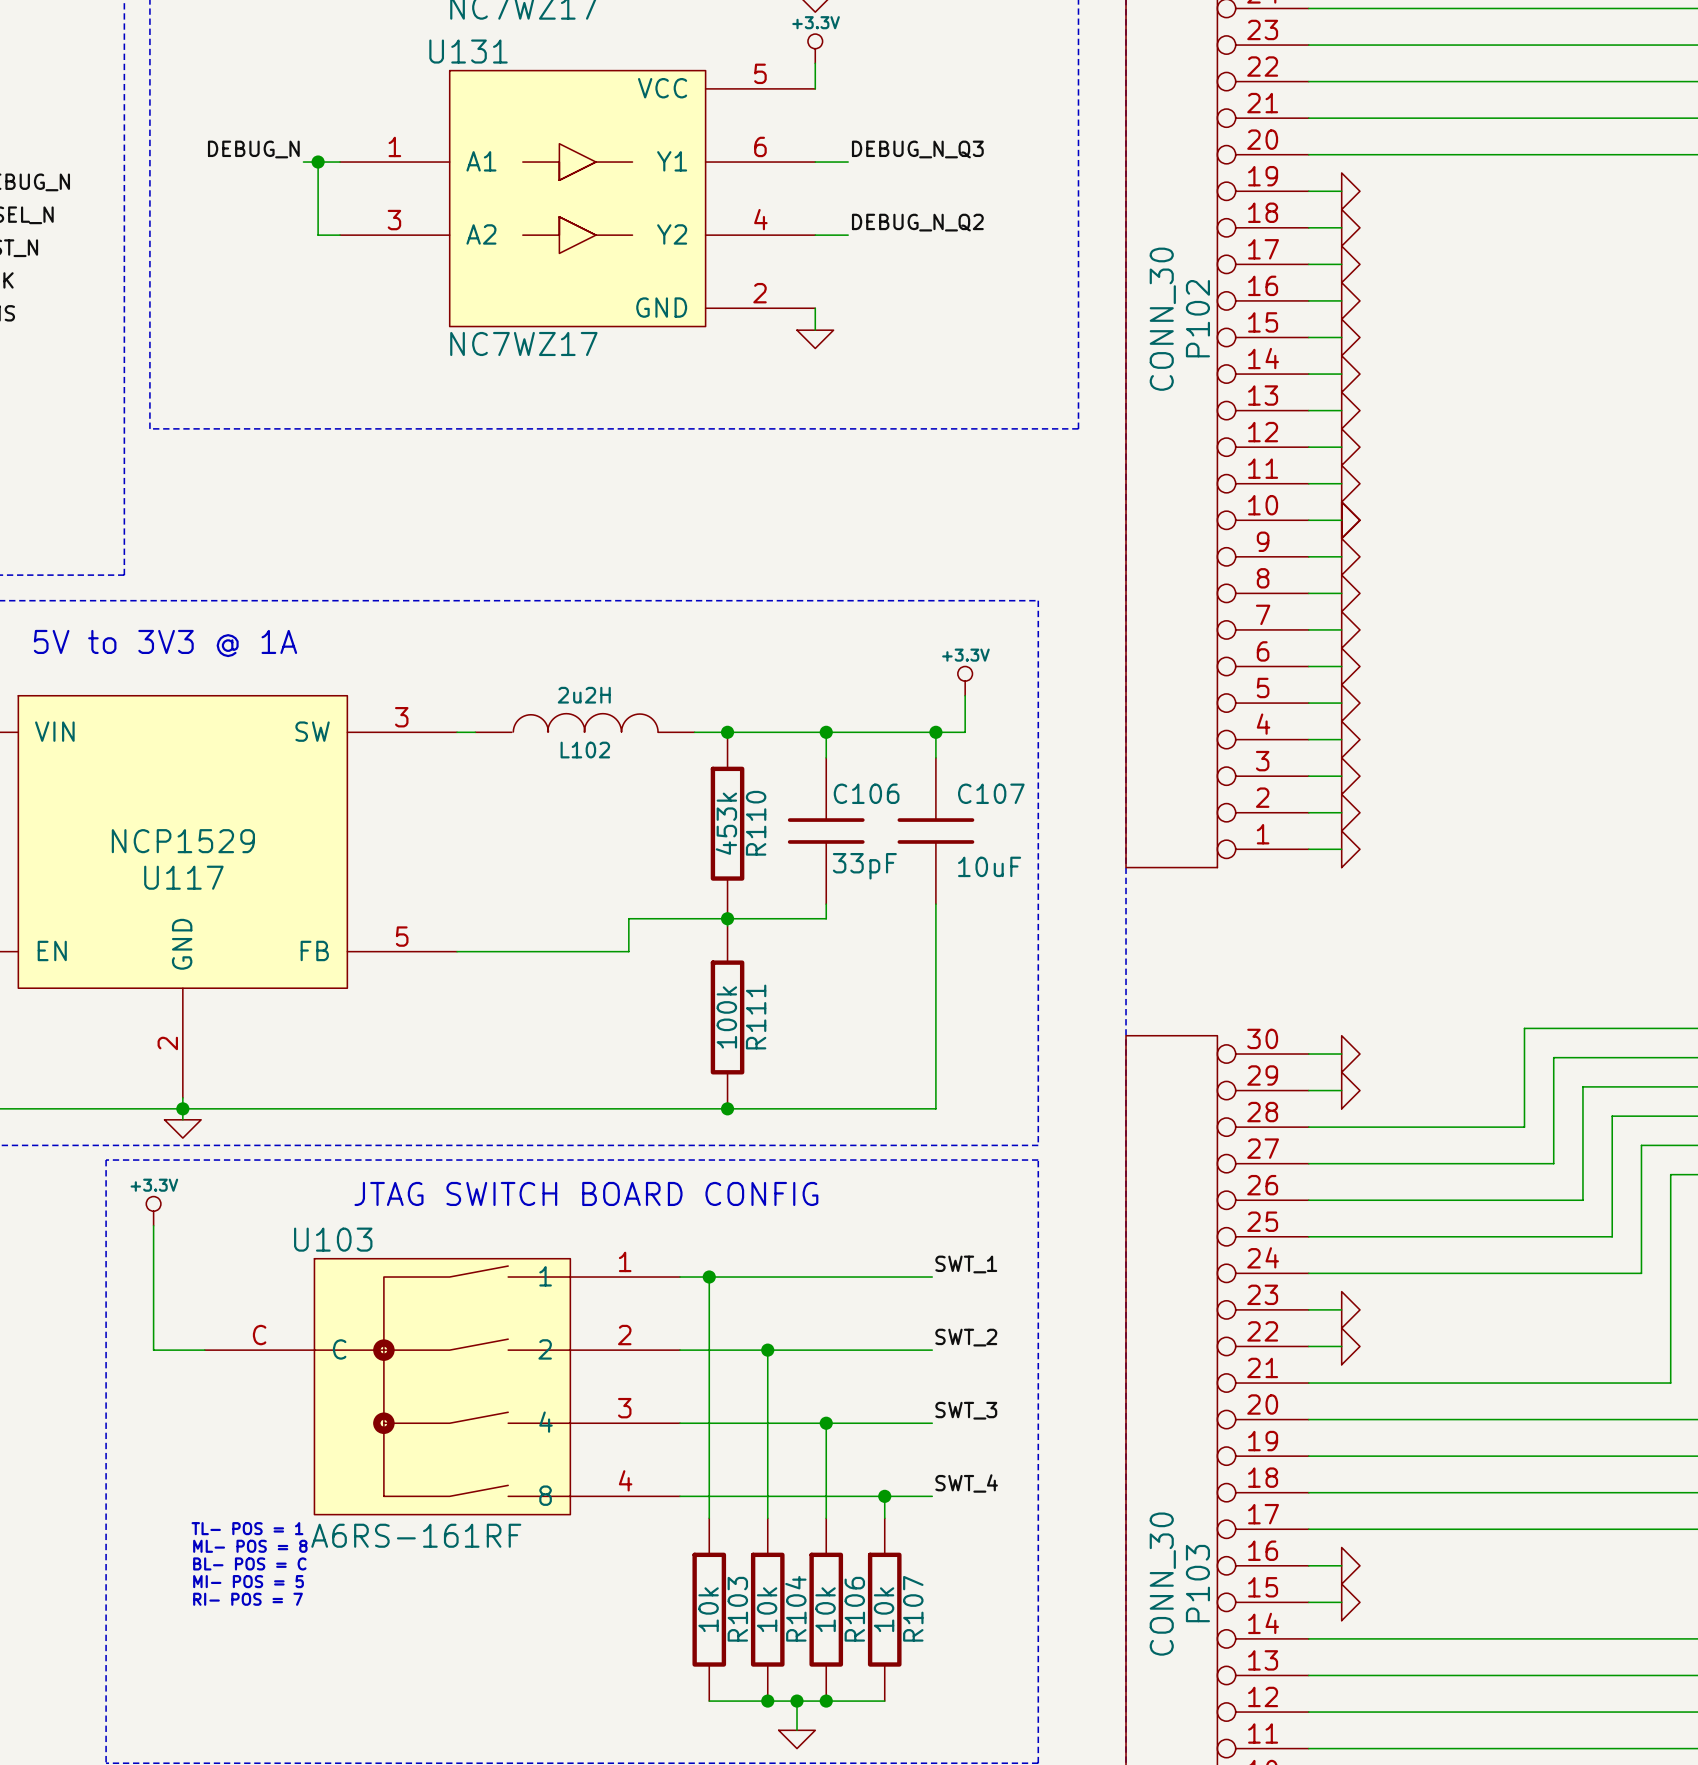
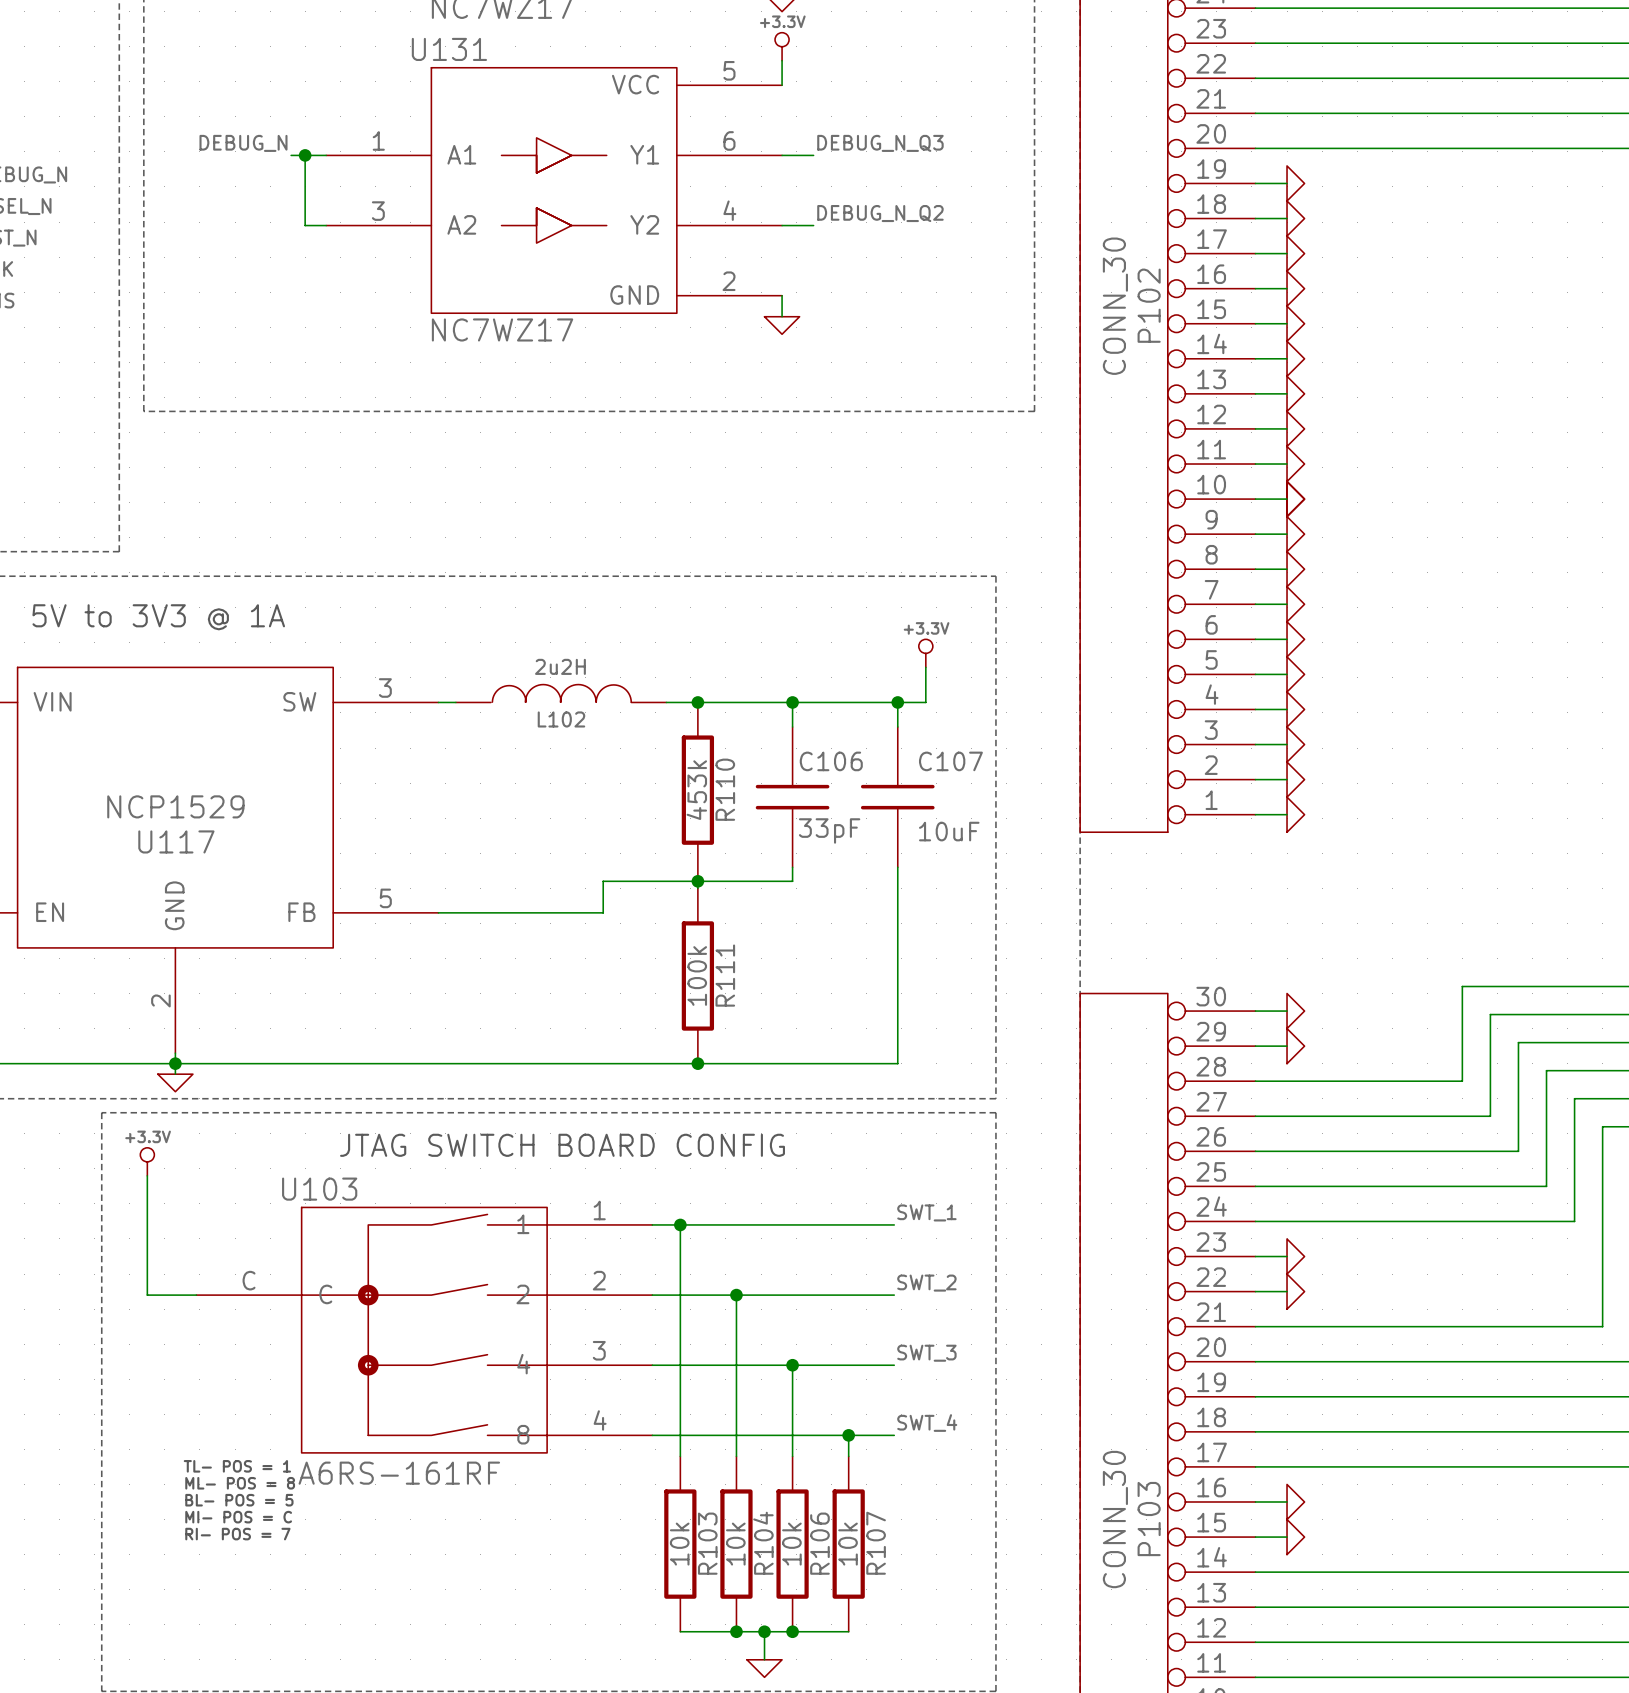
text: BL- POS = C (249, 1563) -> BL- POS = 5 (239, 1500)
text: MI- POS = 5 (248, 1581) -> MI- POS = C (238, 1517)

